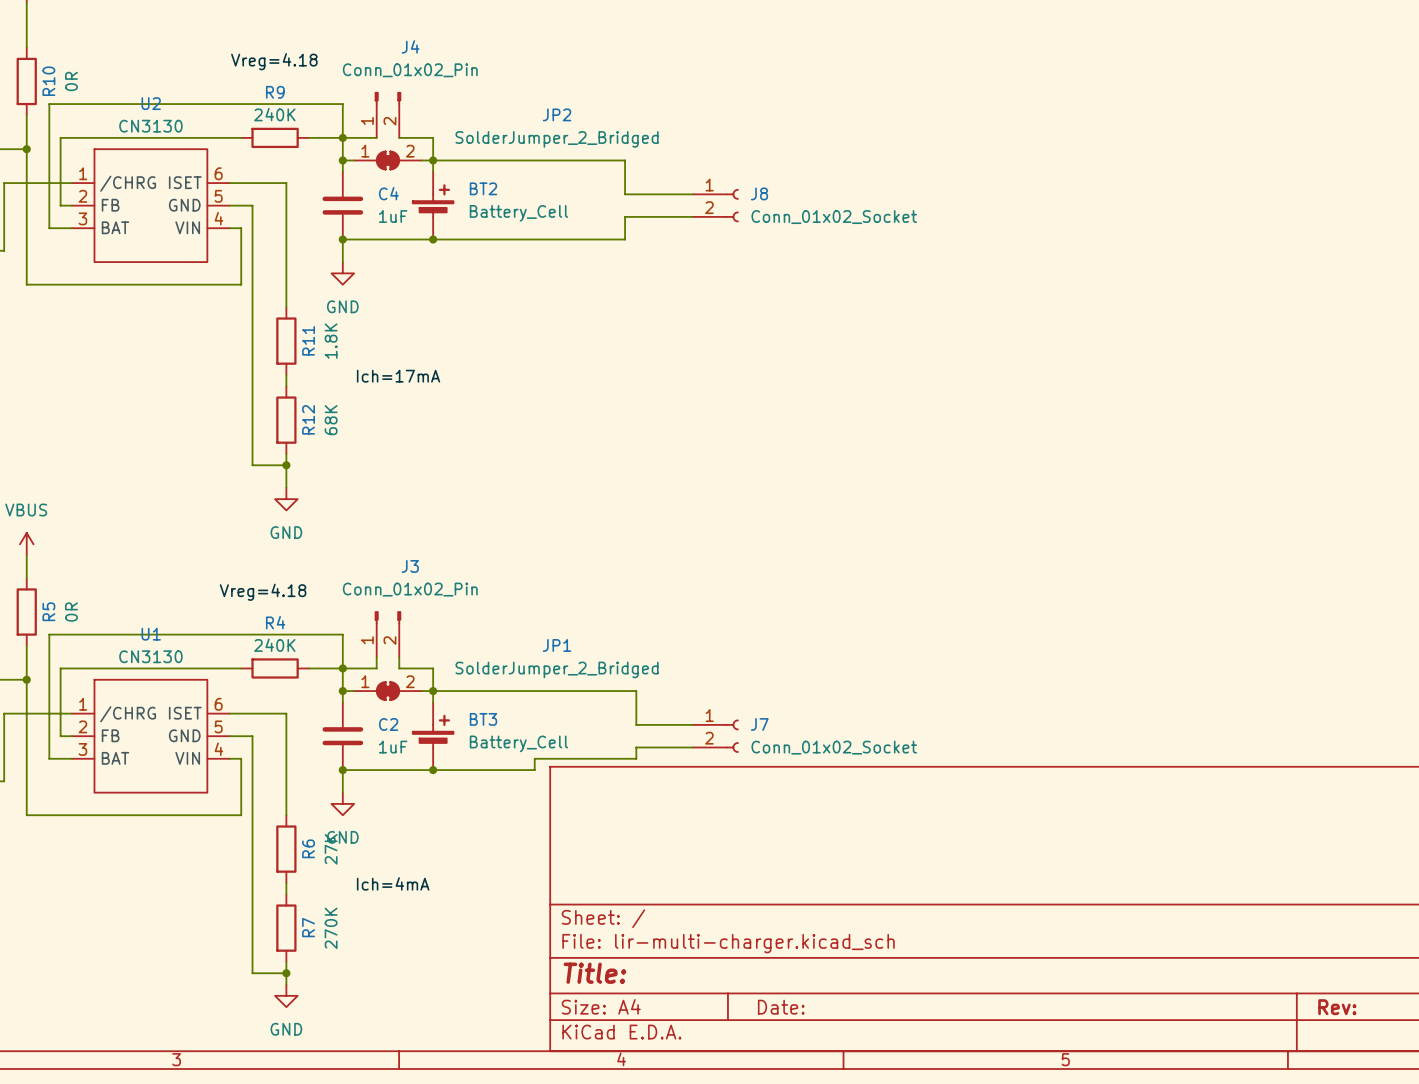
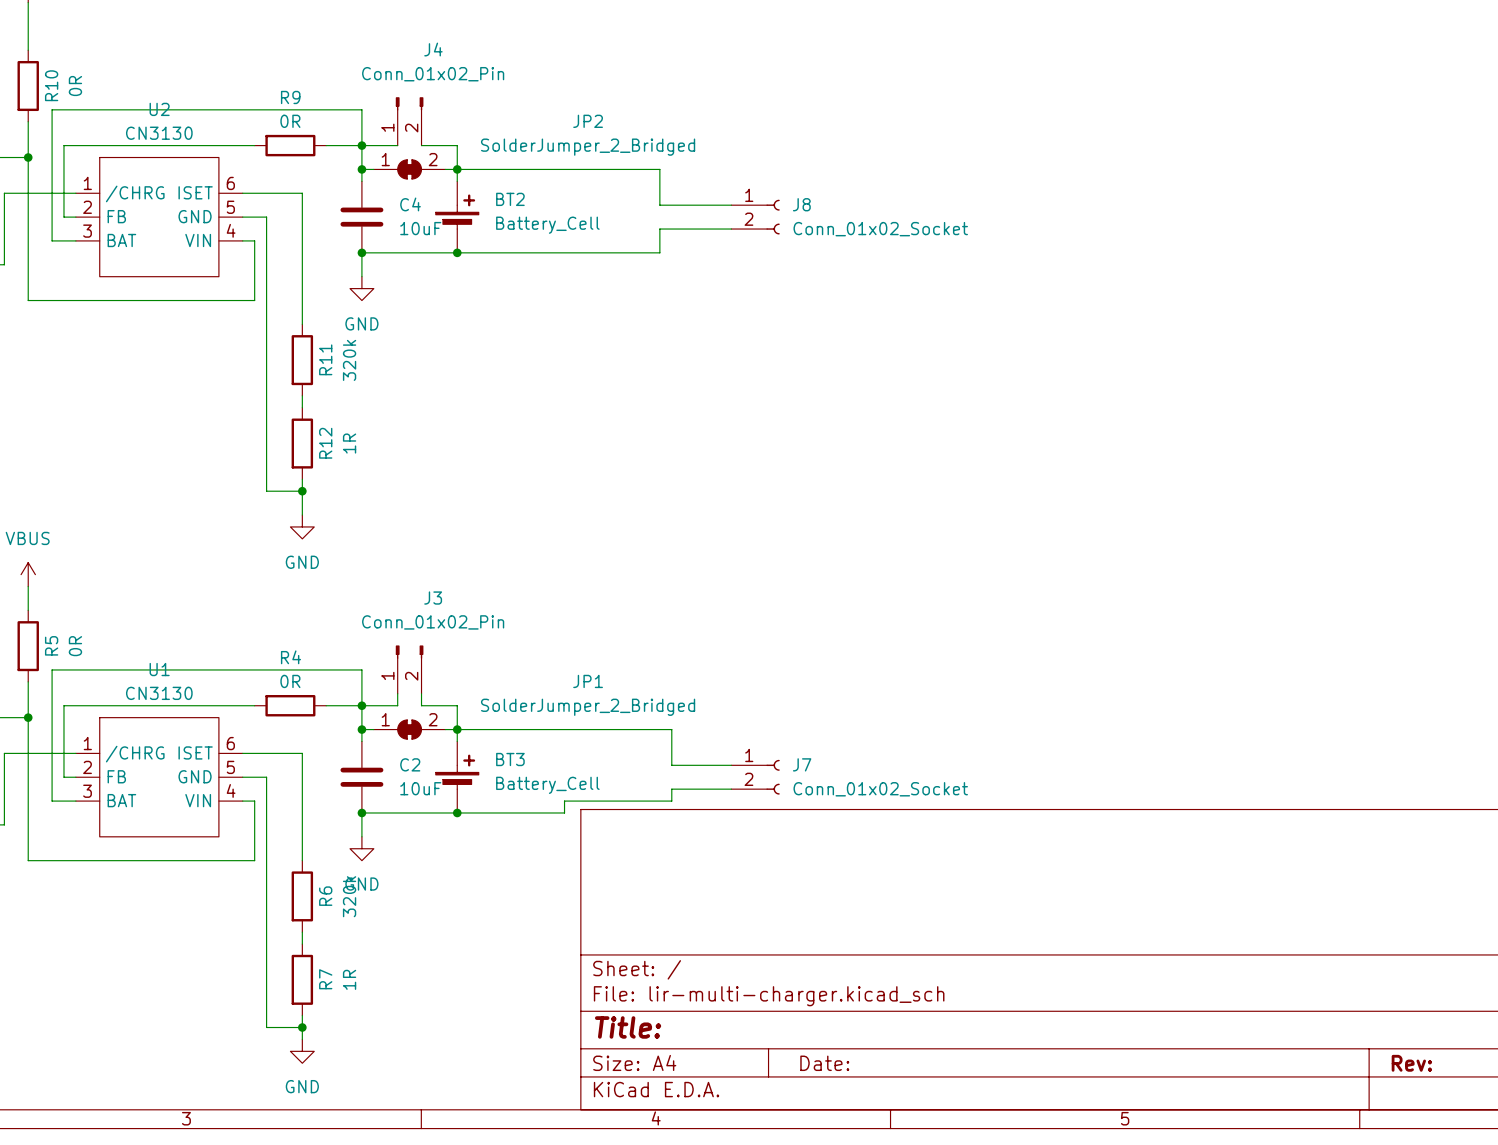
label: Vreg=4.18 (274, 61) -> none
R9 value: 240K (274, 114) -> 0R (290, 121)
C4 value: 1uF (393, 216) -> 10uF (420, 228)
R11 value: 1.8K (331, 341) -> 320k (349, 360)
label: Ich=17mA (398, 376) -> none
R12 value: 68K (331, 420) -> 1R (349, 443)
label: Vreg=4.18 (263, 592) -> none
R4 value: 240K (274, 645) -> 0R (290, 681)
C2 value: 1uF (393, 747) -> 10uF (420, 788)
R6 value: 27K (331, 849) -> 320k (349, 896)
label: Ich=4mA (393, 883) -> none
R7 value: 270K (331, 928) -> 1R (349, 979)

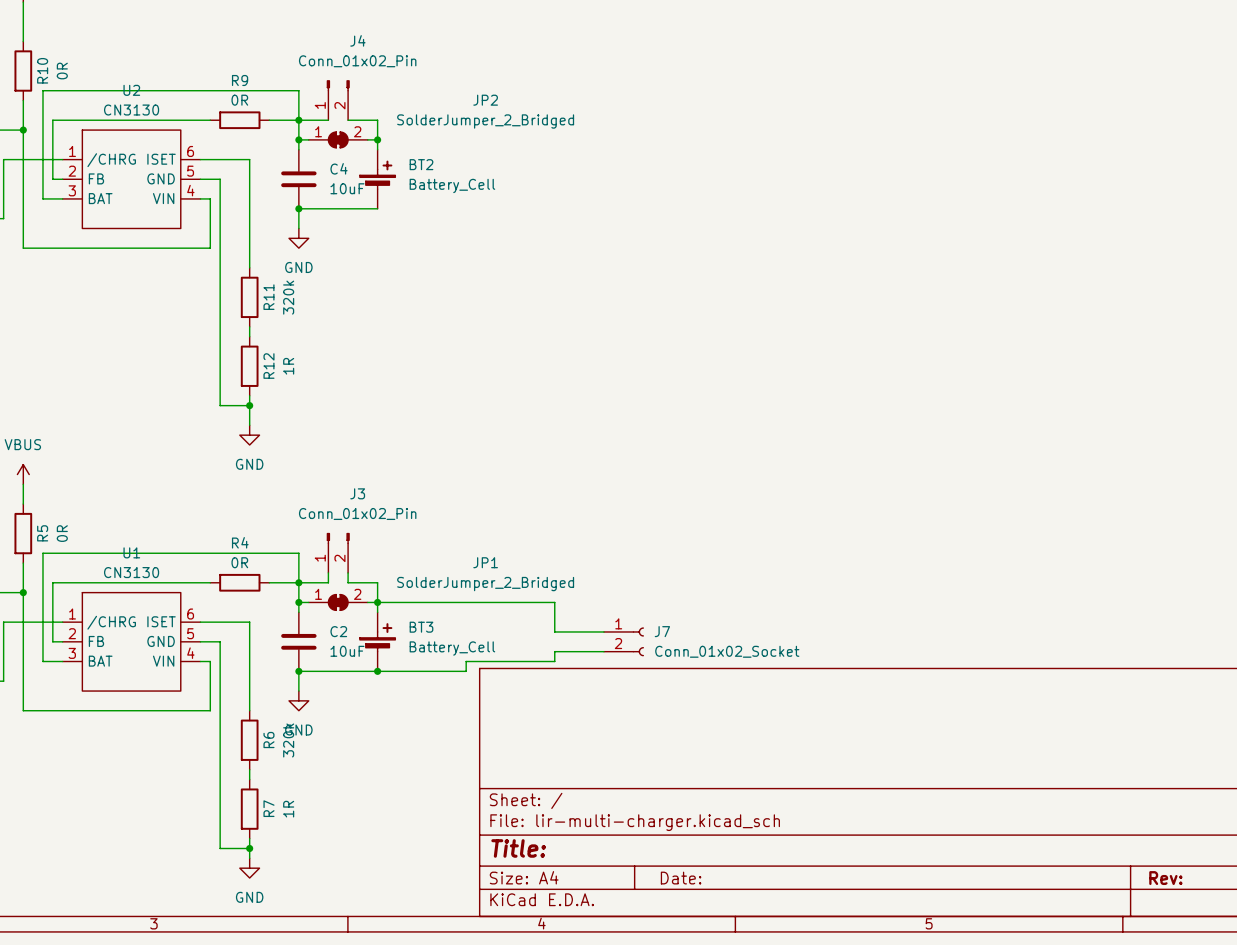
wire: (457, 169) (659, 169) (659, 205) (731, 205) -> none
J8: Conn_01x02_Socket (755, 217) -> none
wire: (731, 229) (659, 229) (659, 252) (457, 252) -> none
junction: (457, 252) -> none

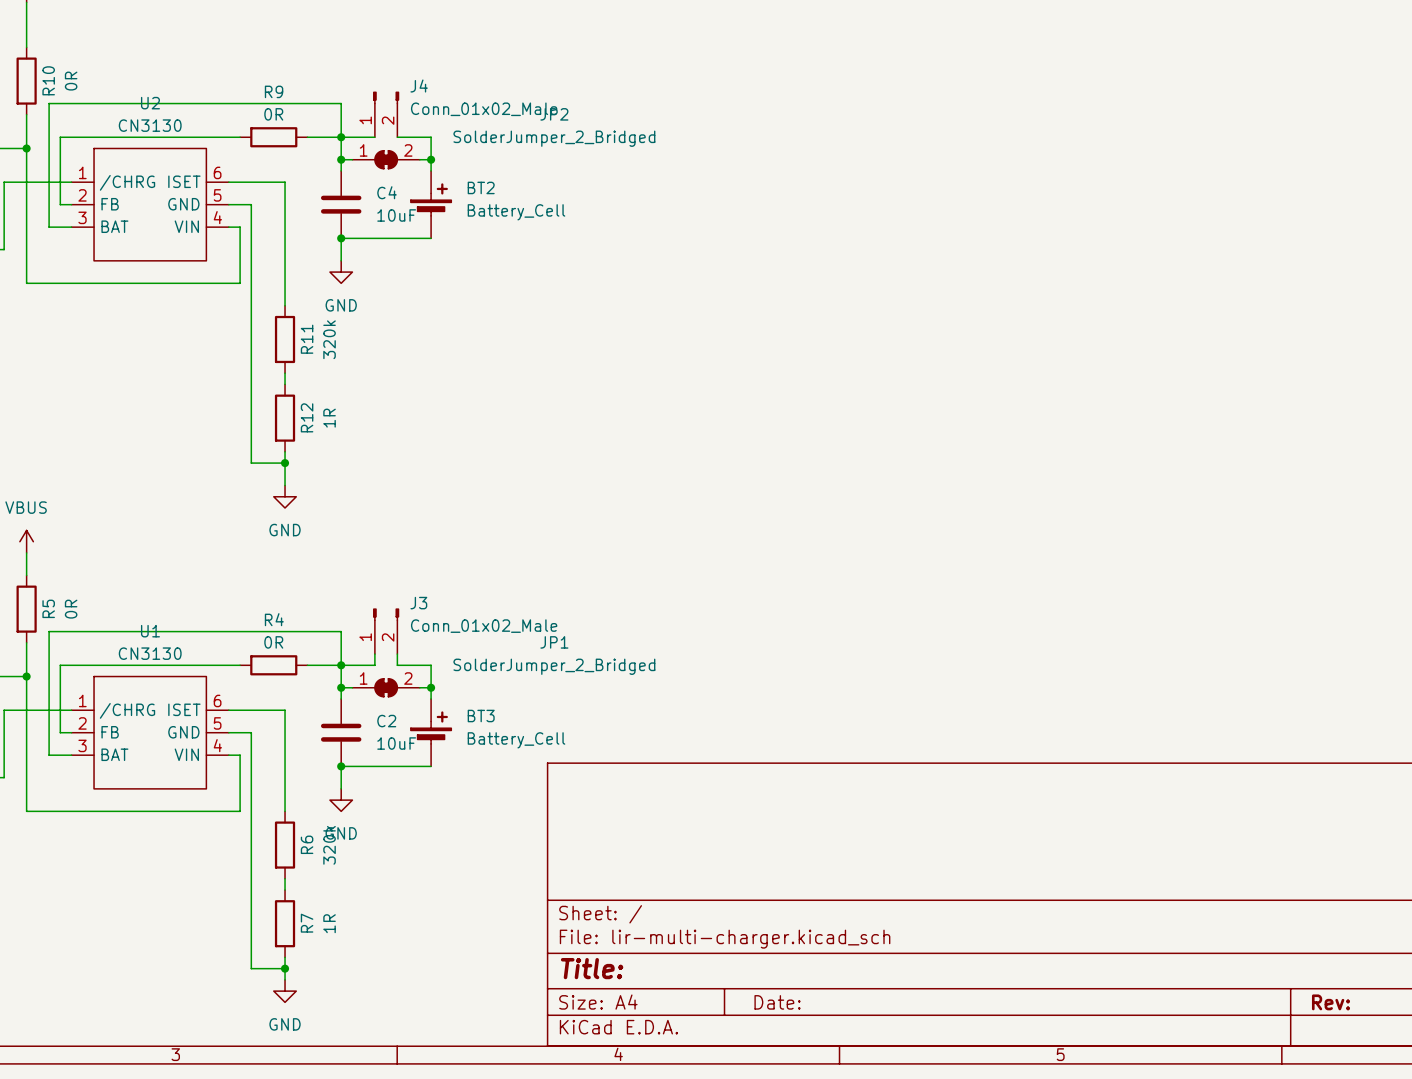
J4 name position: J4 (357, 40) -> J4 (419, 86)
J4 value: Conn_01x02_Pin (357, 61) -> Conn_01x02_Male (484, 109)
J3 name position: J3 (357, 493) -> J3 (418, 603)
J3 value: Conn_01x02_Pin (357, 513) -> Conn_01x02_Male (484, 626)
wire: (377, 602) (554, 602) (554, 631) (603, 631) -> none
J7: Conn_01x02_Socket (623, 641) -> none
wire: (603, 651) (554, 651) (554, 661) (466, 661) (466, 671) (377, 671) -> none
junction: (377, 671) -> none

